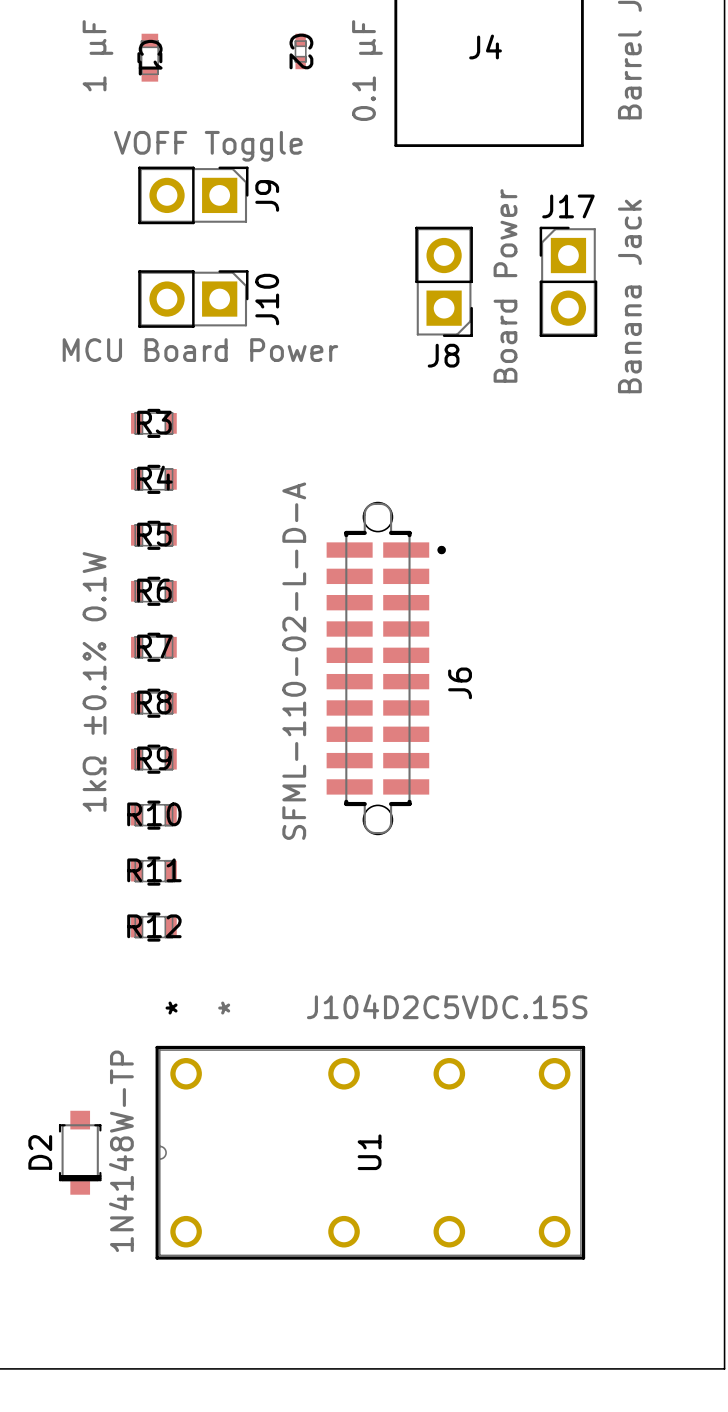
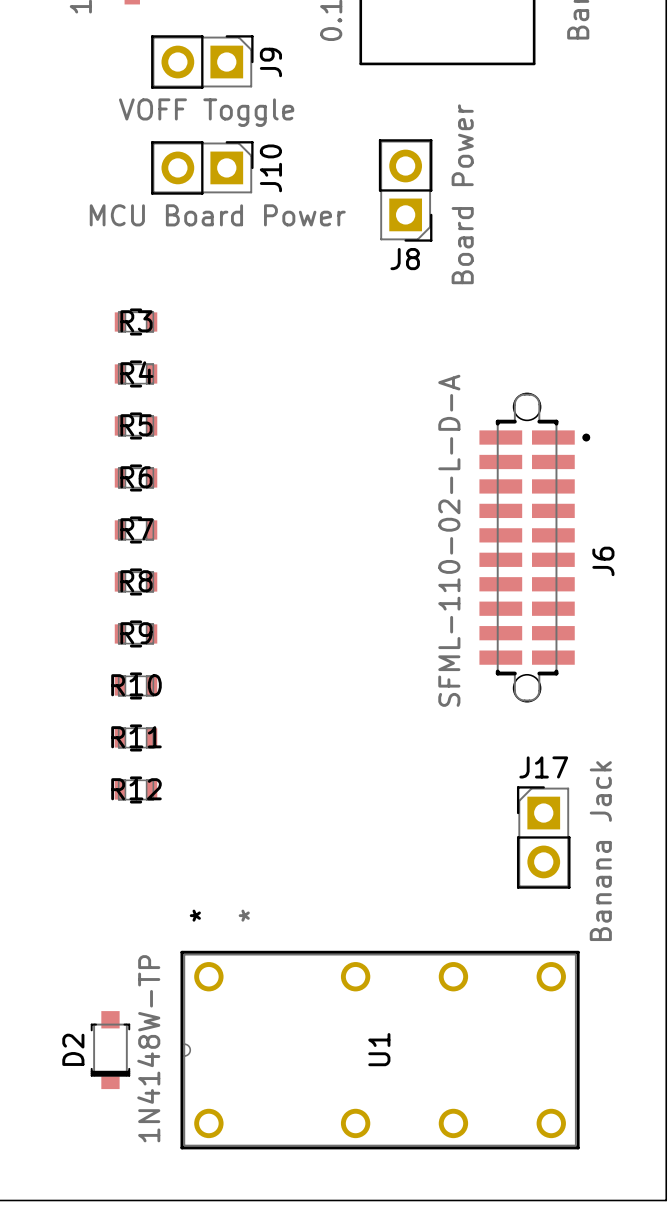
J9 value position: VOFF Toggle (208, 146) -> VOFF Toggle (206, 112)
J9 position: (193, 195) -> (202, 62)
J17 position: (568, 281) -> (543, 837)
J10 position: (193, 299) -> (202, 167)
J10 value position: MCU Board Power (200, 350) -> MCU Board Power (217, 215)
J6 position: (386, 668) -> (534, 547)
R7 value: 1kΩ ±0.1% 0.1W (94, 681) -> none
U1 value: J104D2C5VDC.15S (447, 1006) -> none
D2 position: (80, 1152) -> (110, 1050)
U1 position: (370, 1152) -> (380, 1050)

